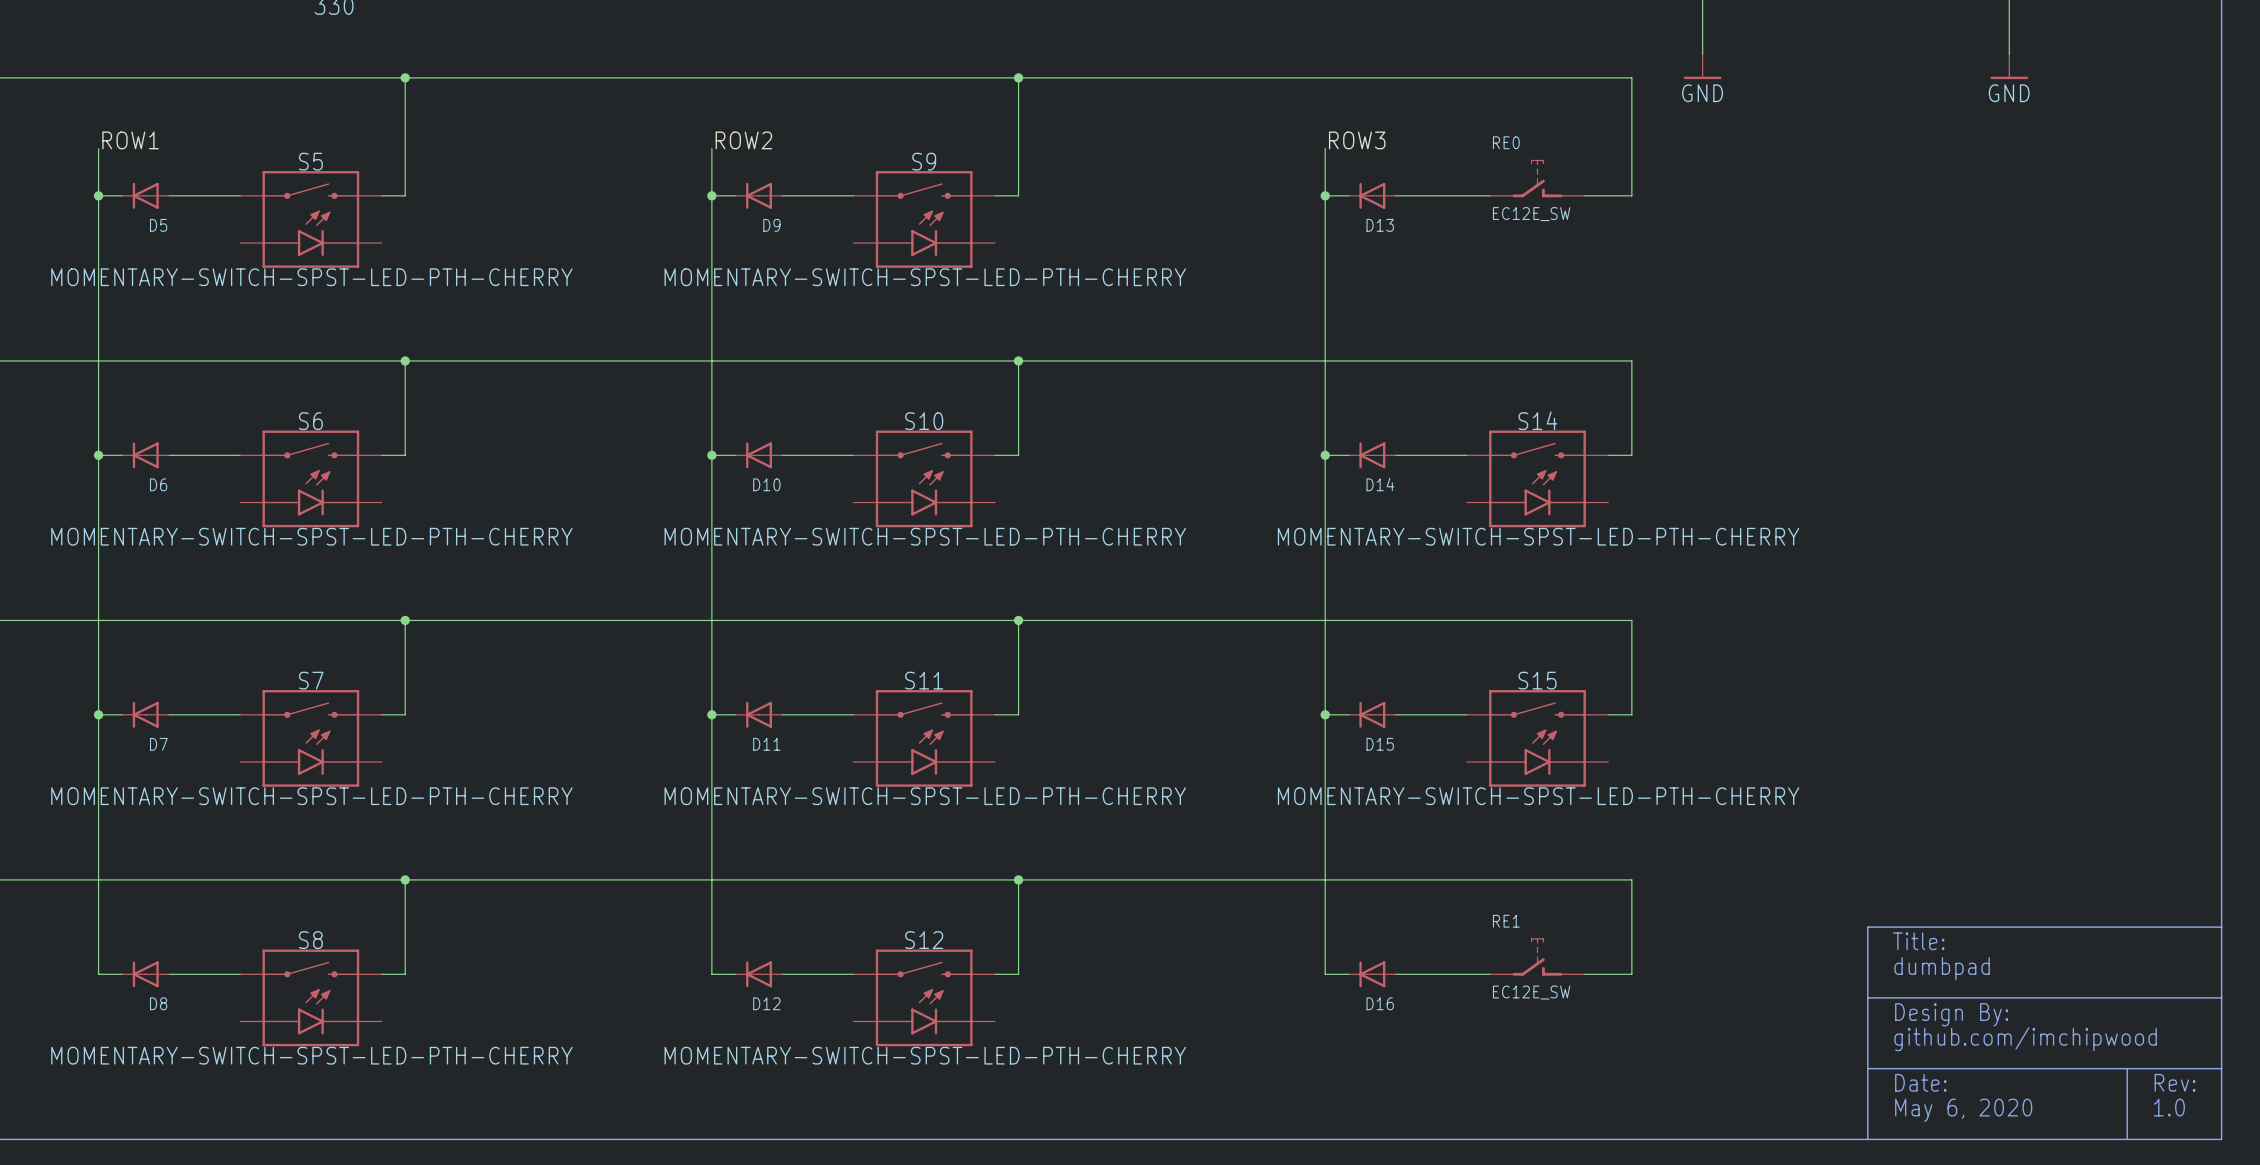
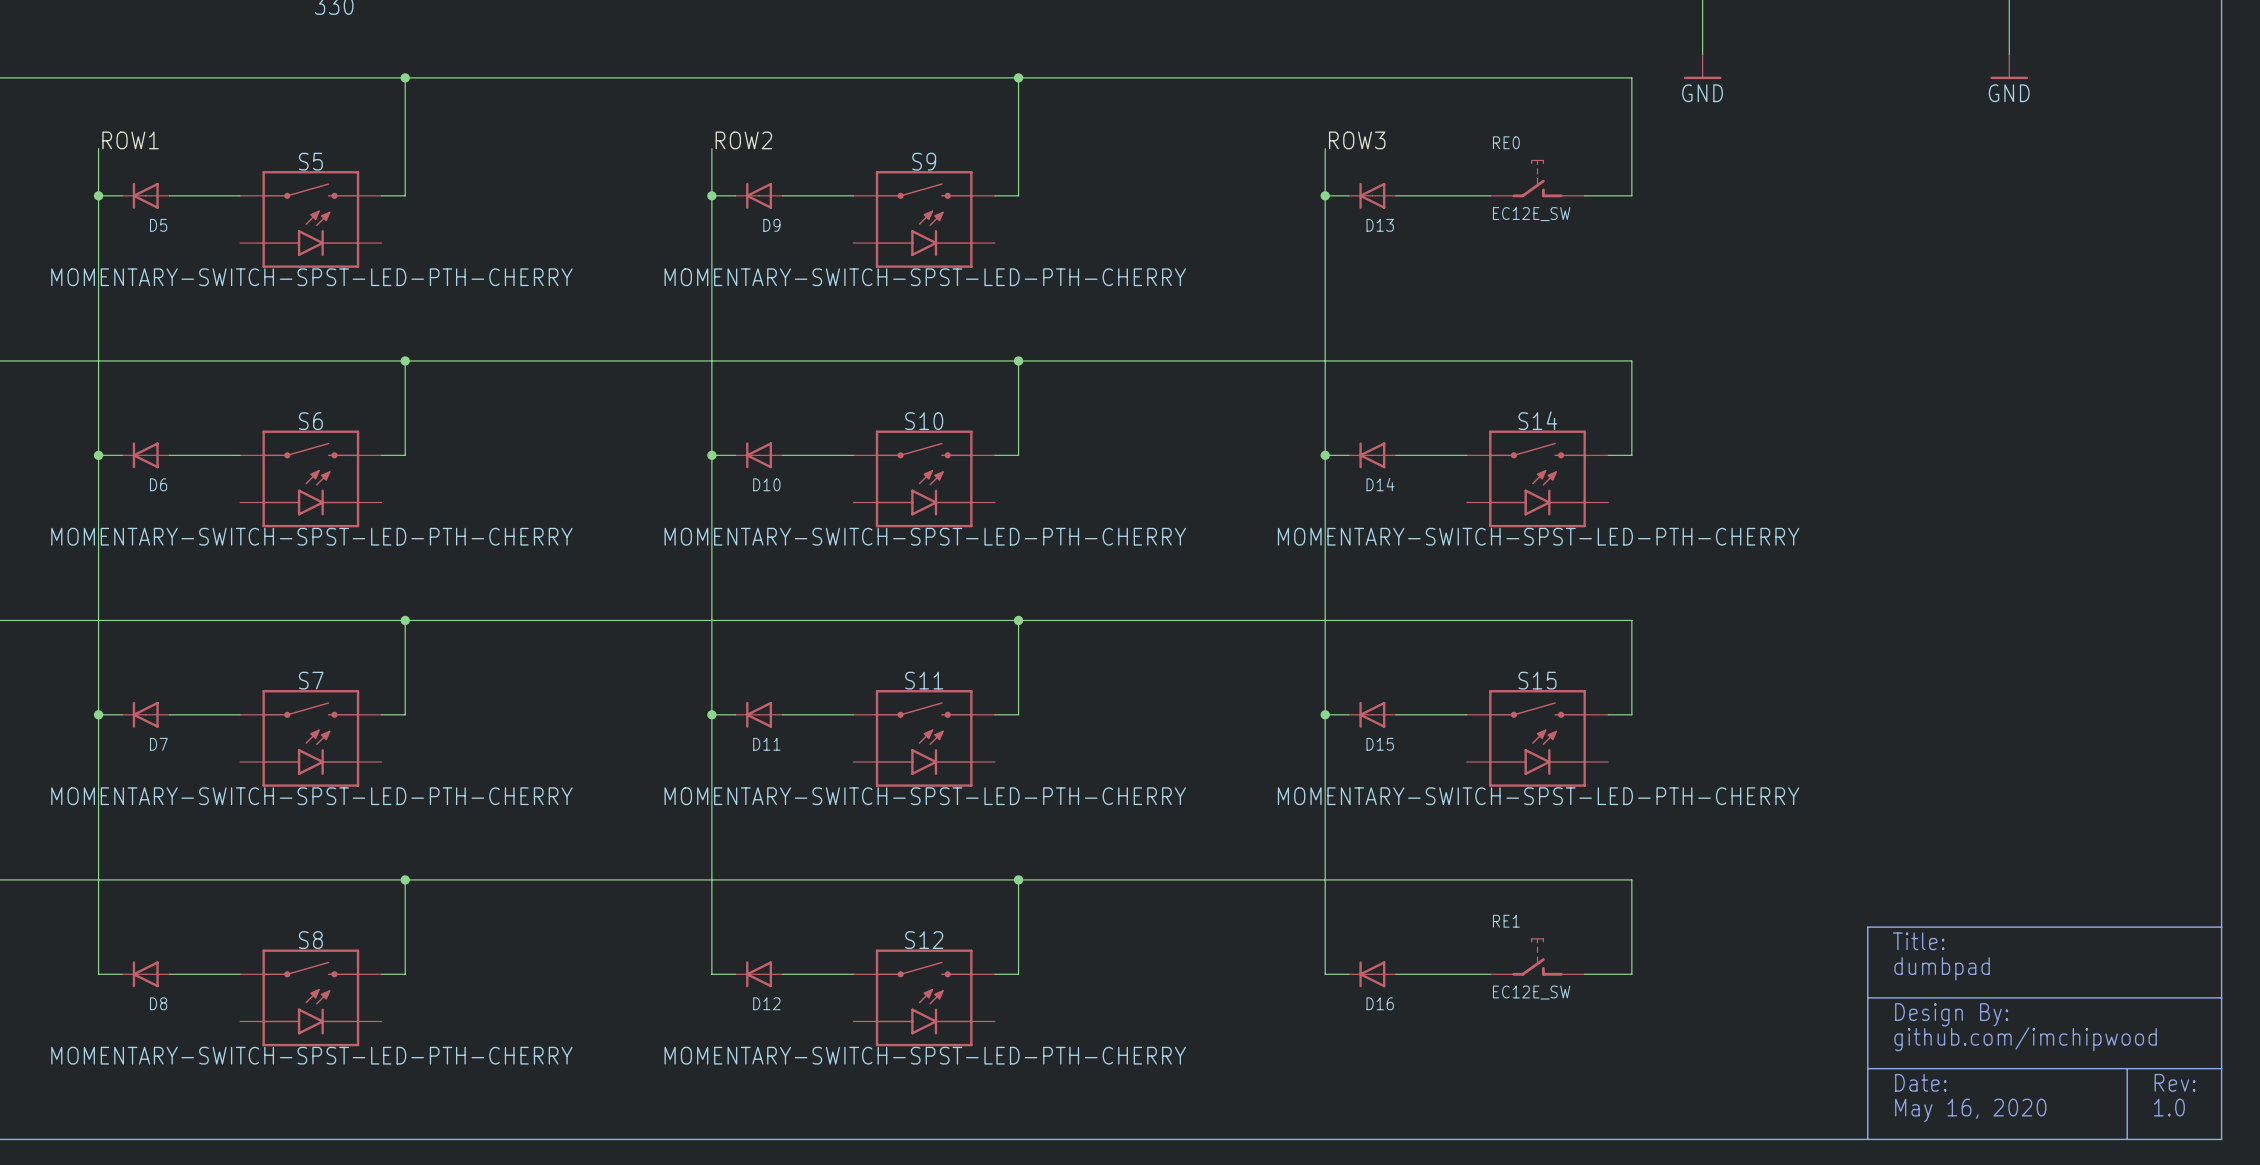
text: May 6, 2020 (1963, 1110) -> May 16, 2020 (1970, 1110)

